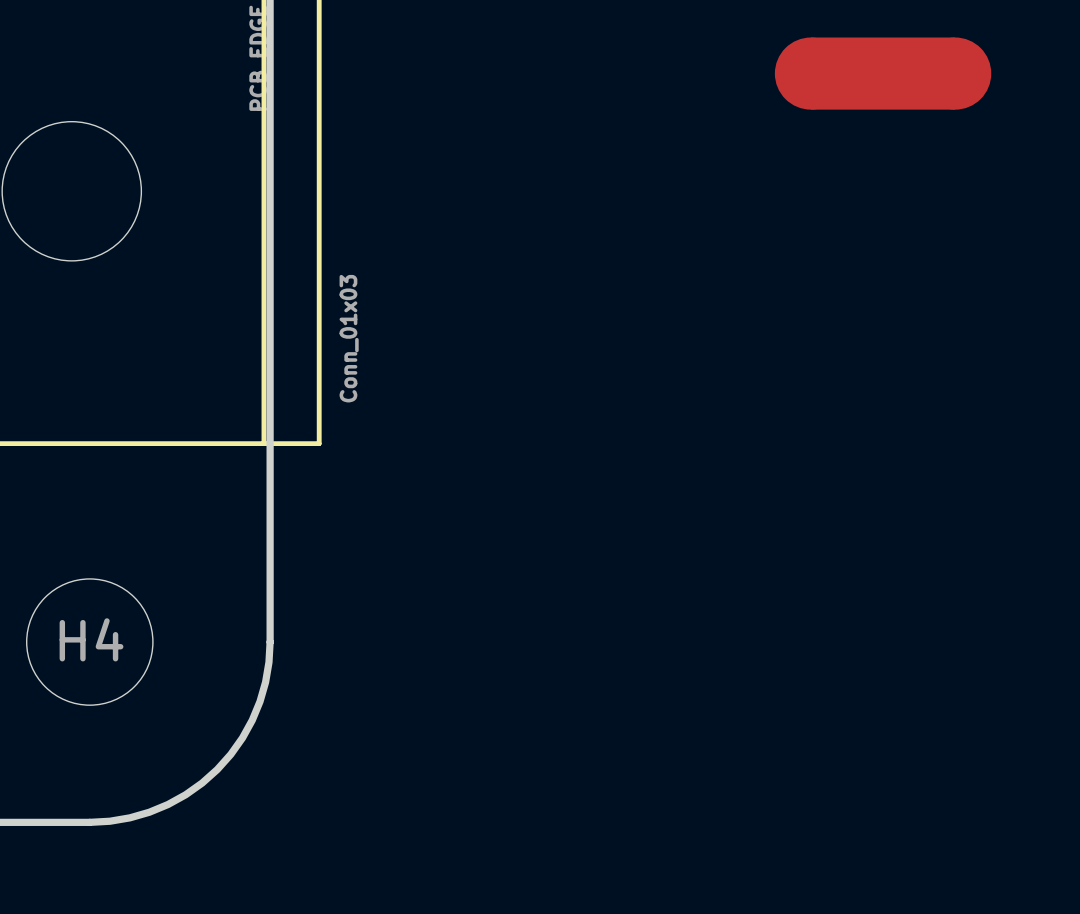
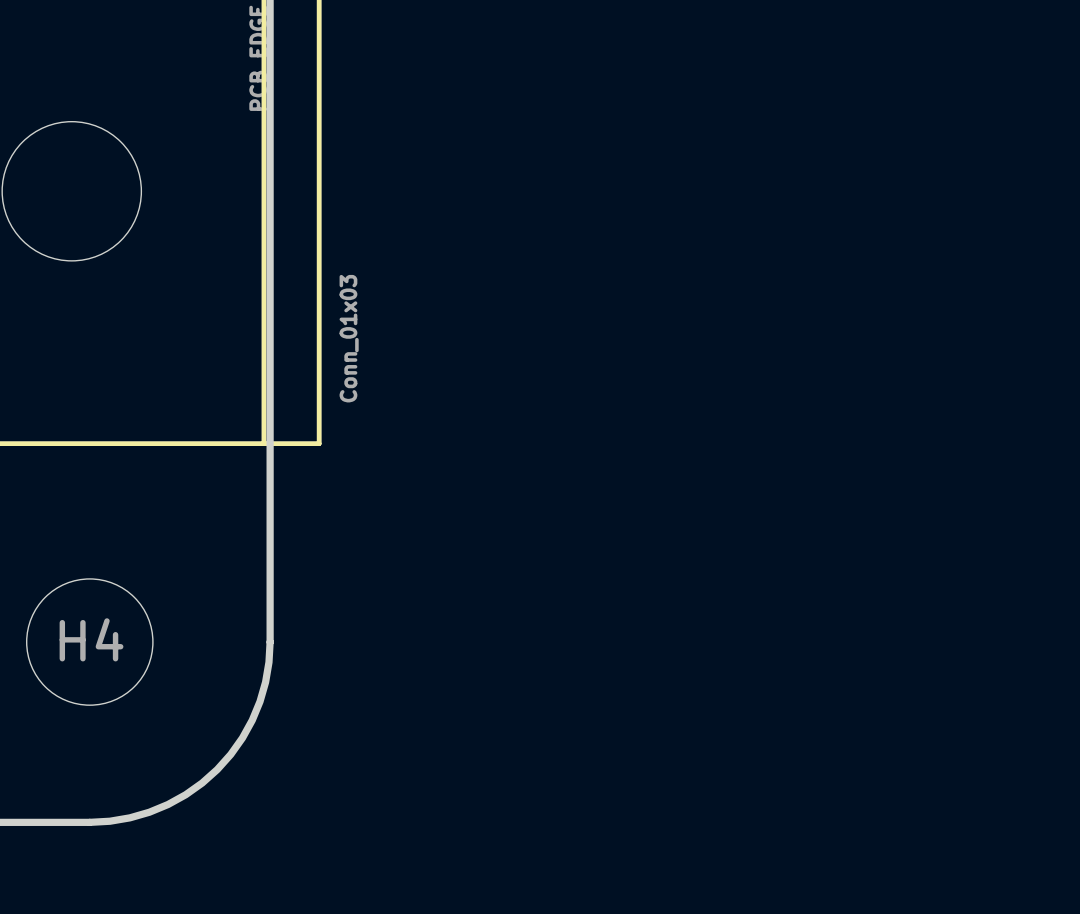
part: (883, 73) -> none

